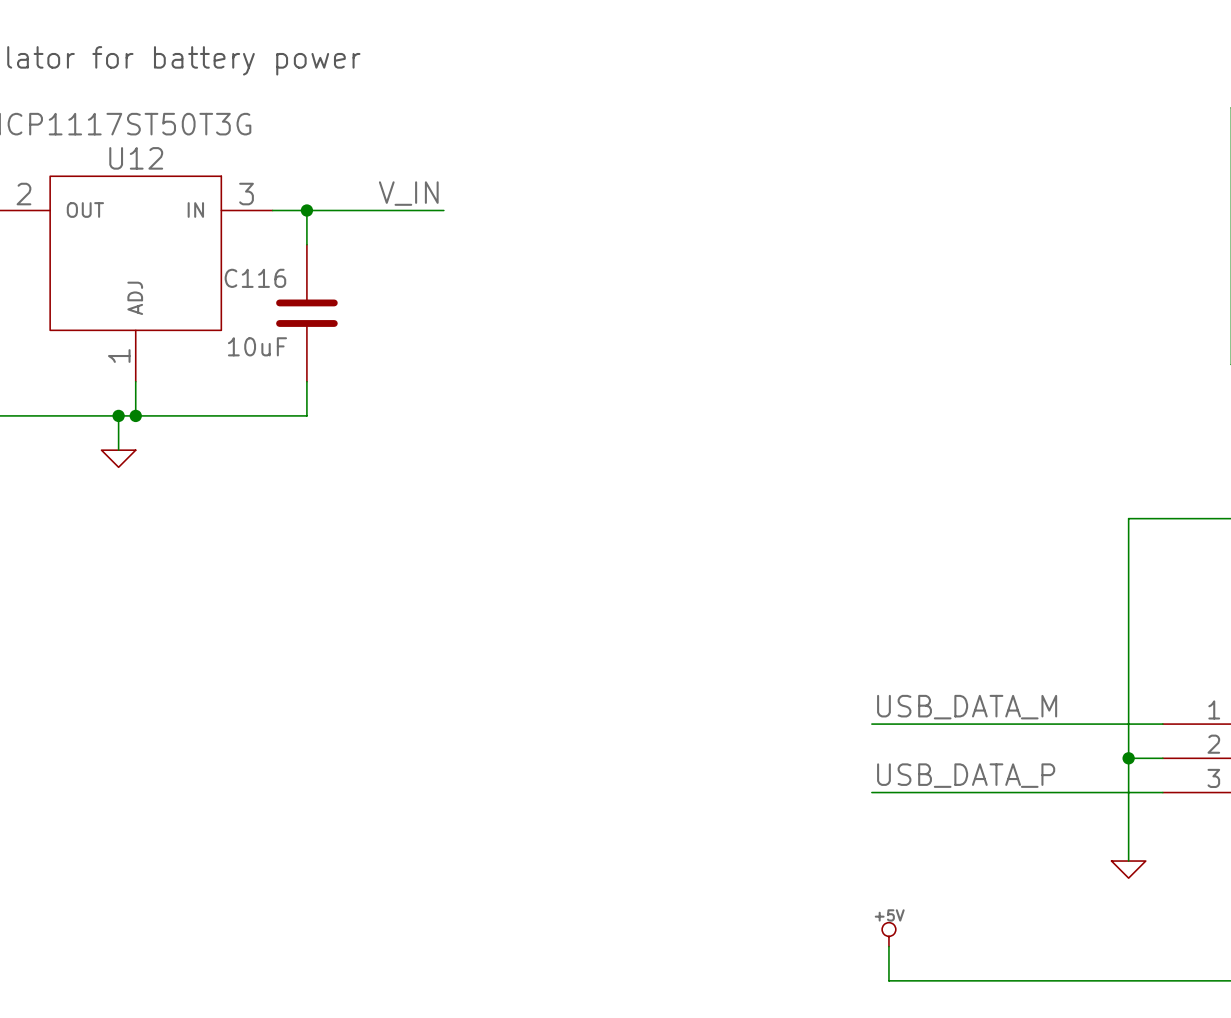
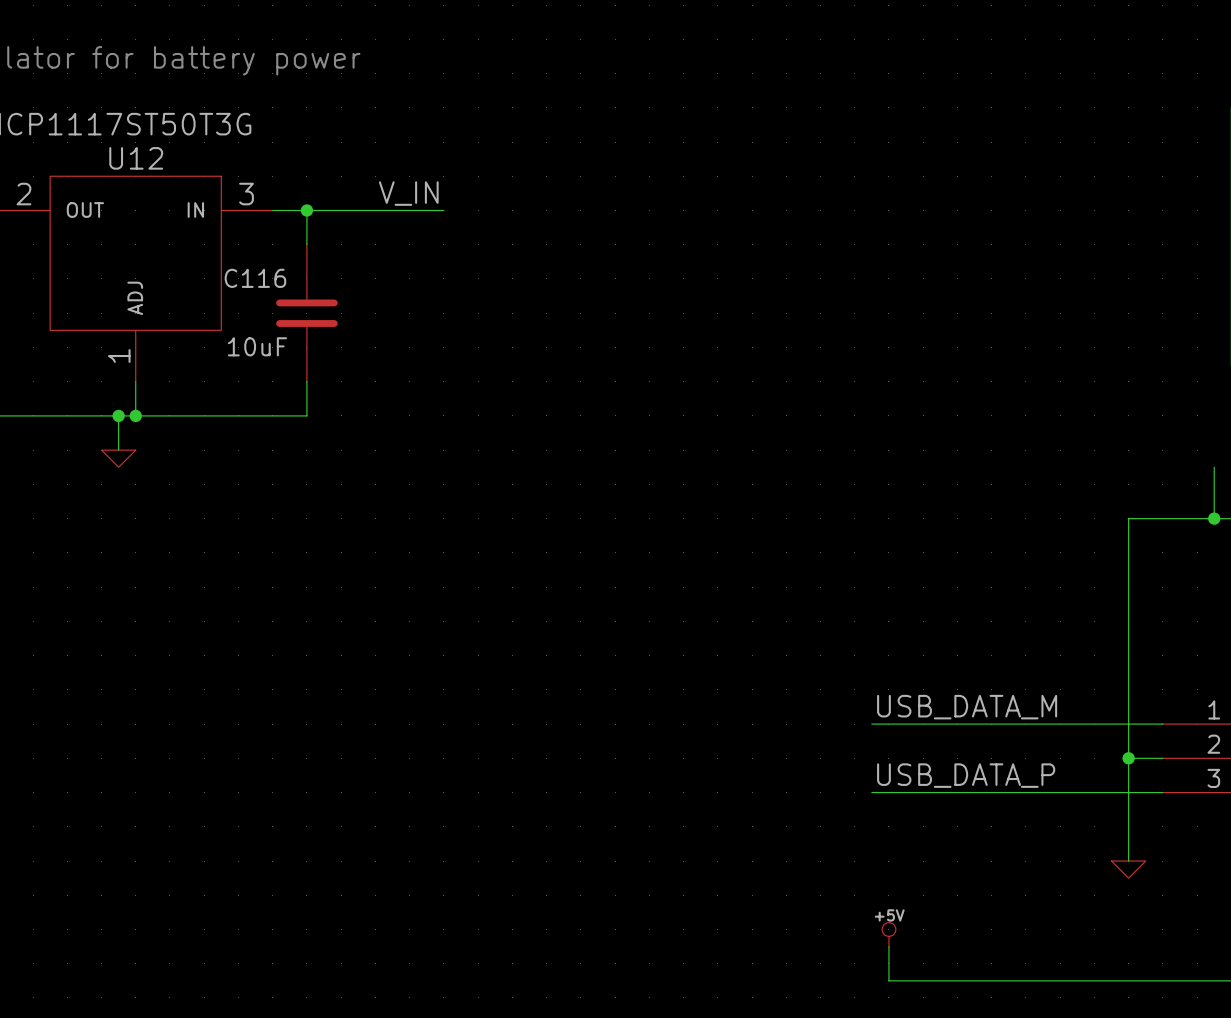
wire: none -> (1214, 467) (1214, 518)
junction: none -> (1214, 518)

